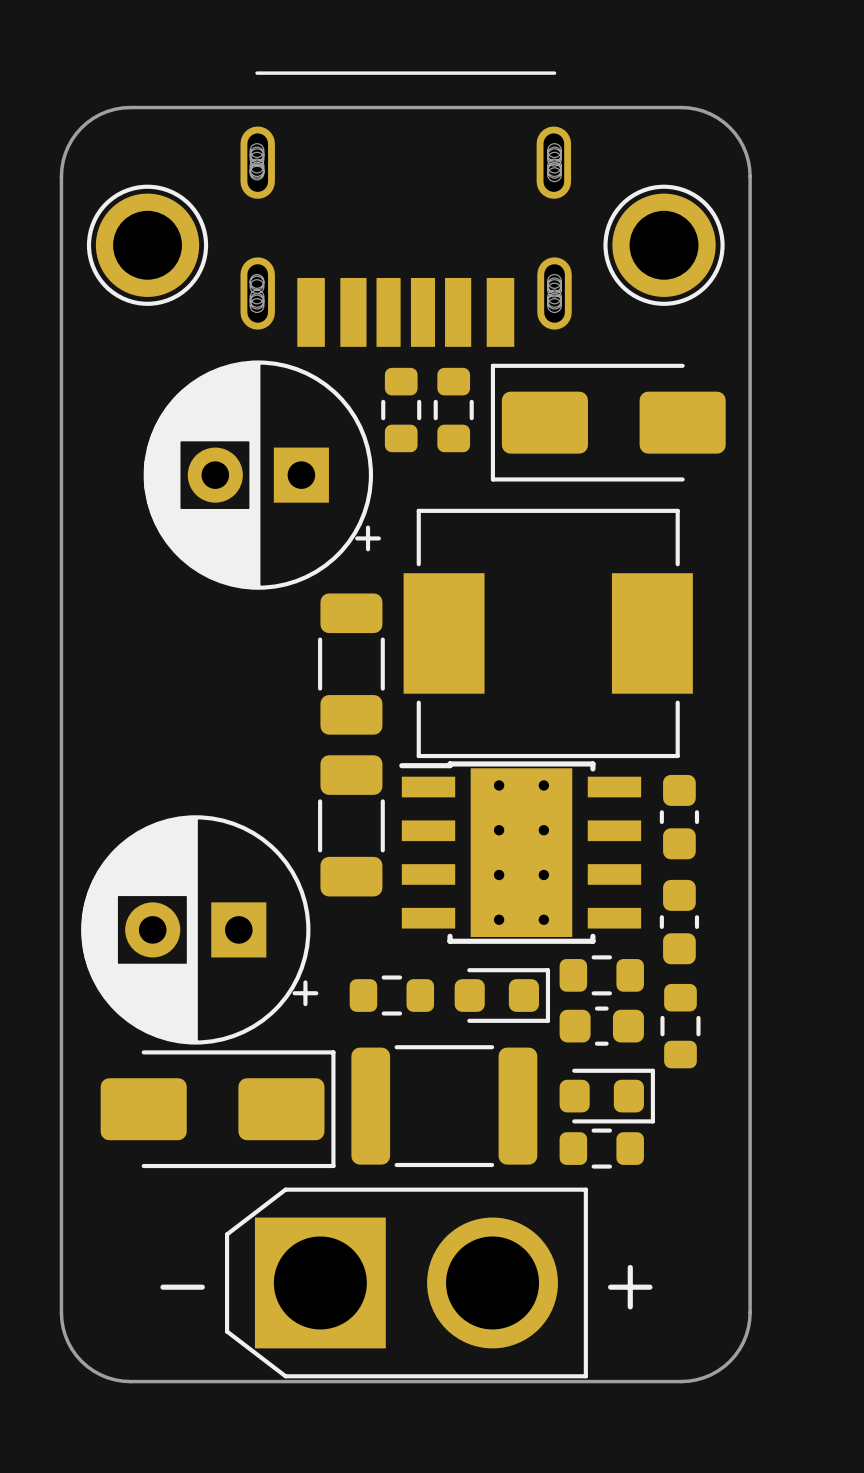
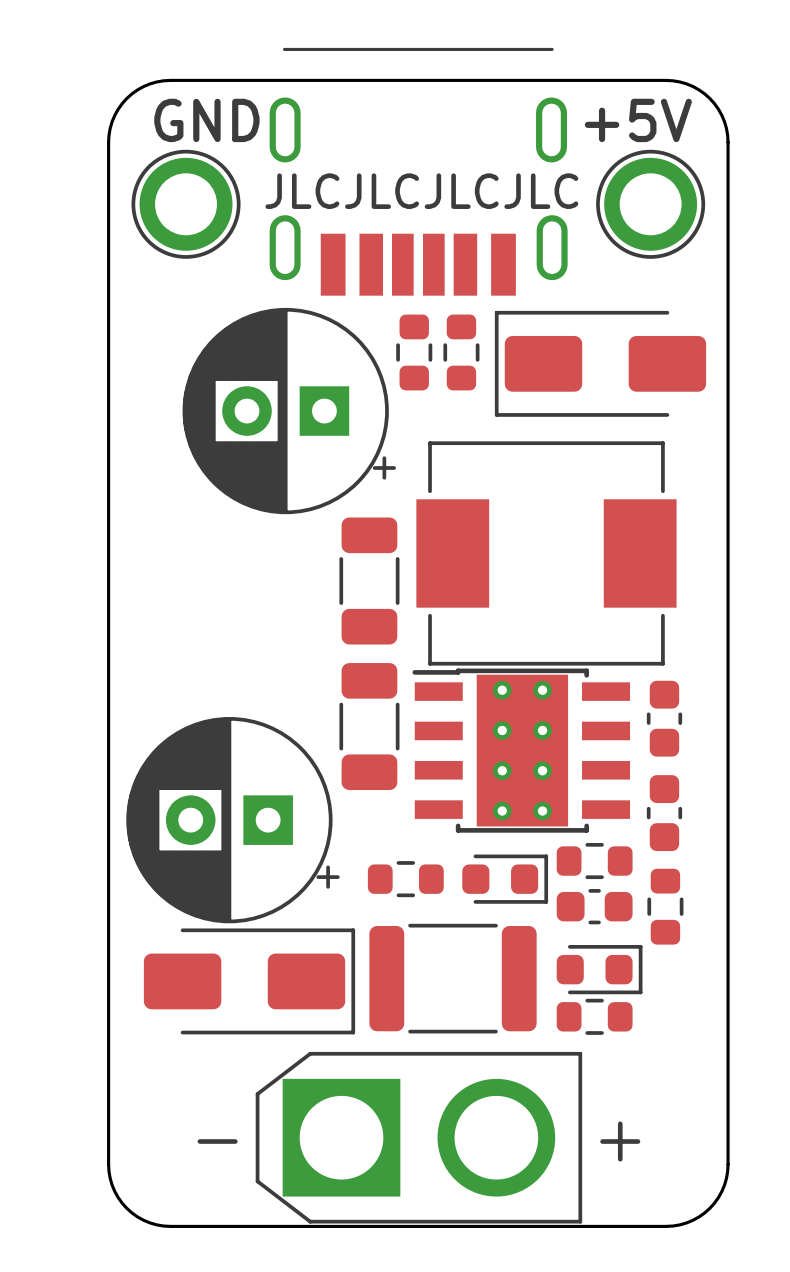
part footprint: [240, 71, 572, 347] -> [269, 47, 568, 296]
text: none -> GND (206, 120)
text: none -> +5V (638, 120)
text: none -> JLCJLCJLCJLC (421, 191)

